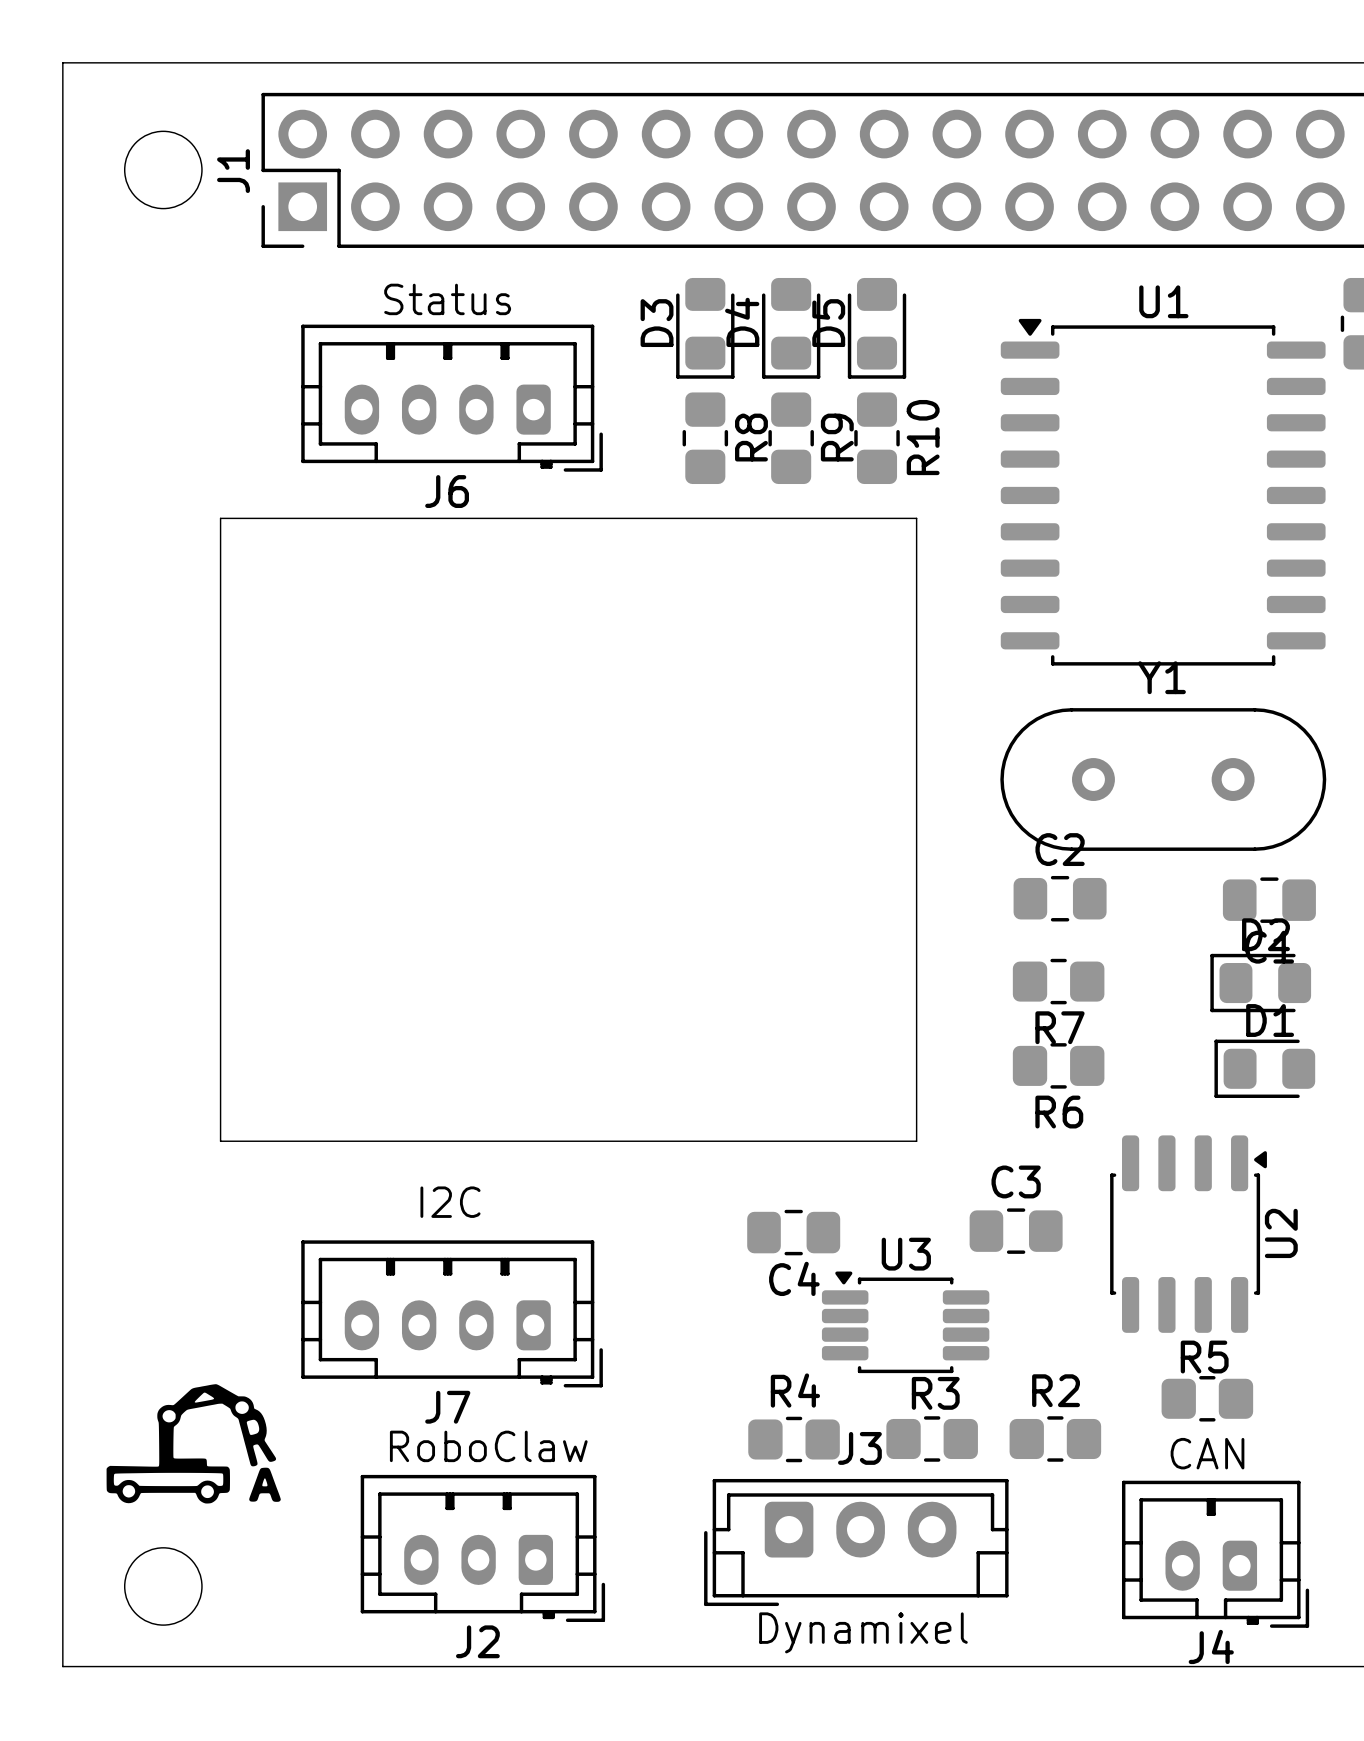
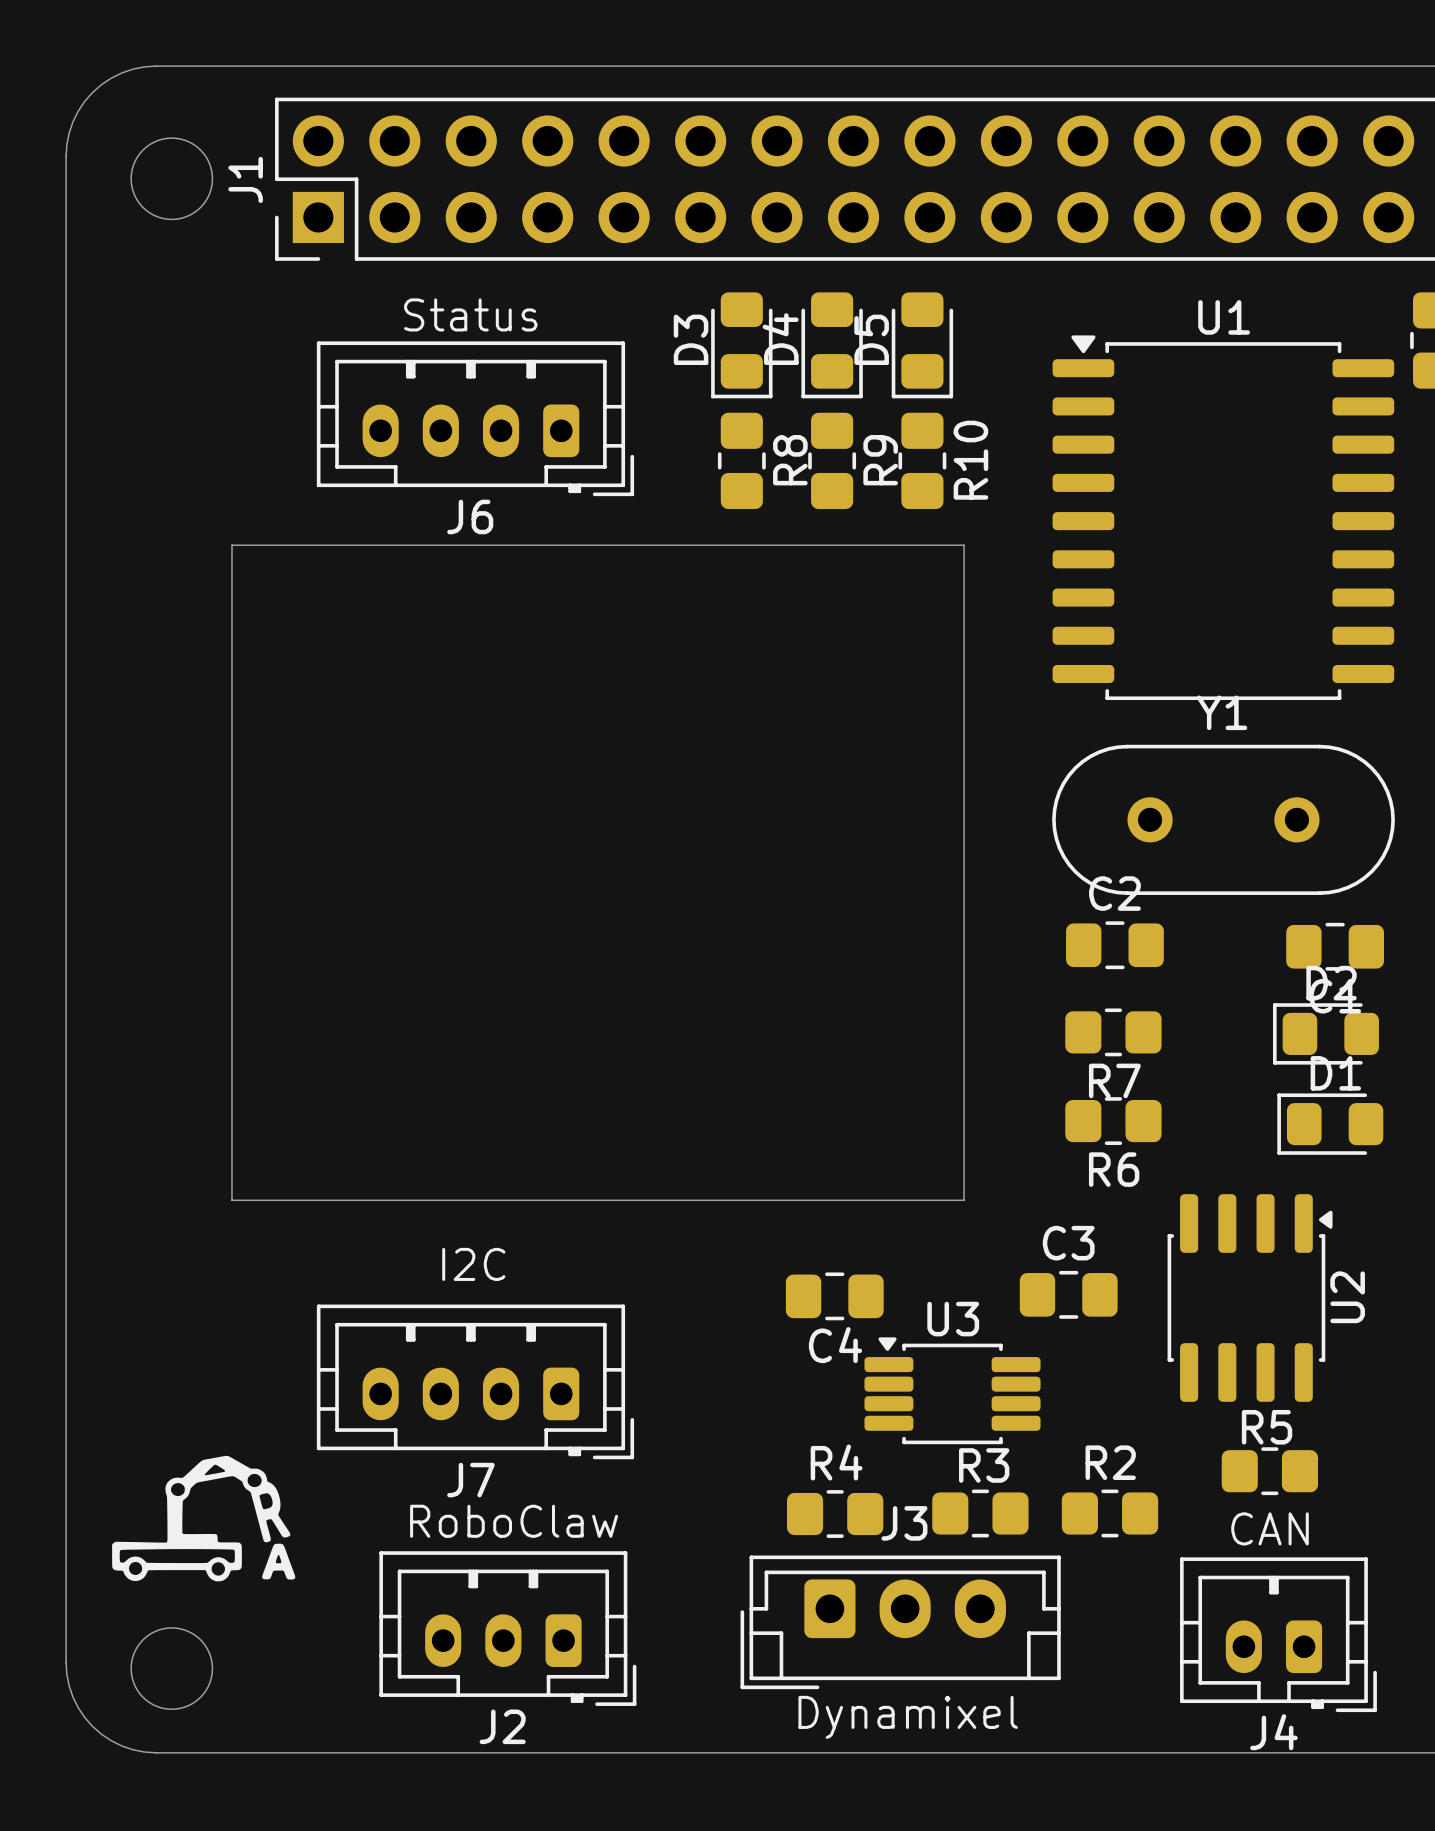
board edge: (148, 62) (62, 62) (62, 148) -> (156, 66) (144, 66) (121, 72) (111, 78) (92, 92) (84, 101) (72, 121) (69, 133) (66, 156)
board edge: (62, 1580) (62, 1666) (148, 1666) -> (66, 1662) (69, 1685) (72, 1697) (84, 1717) (92, 1726) (111, 1740) (121, 1745) (144, 1752) (156, 1752)

